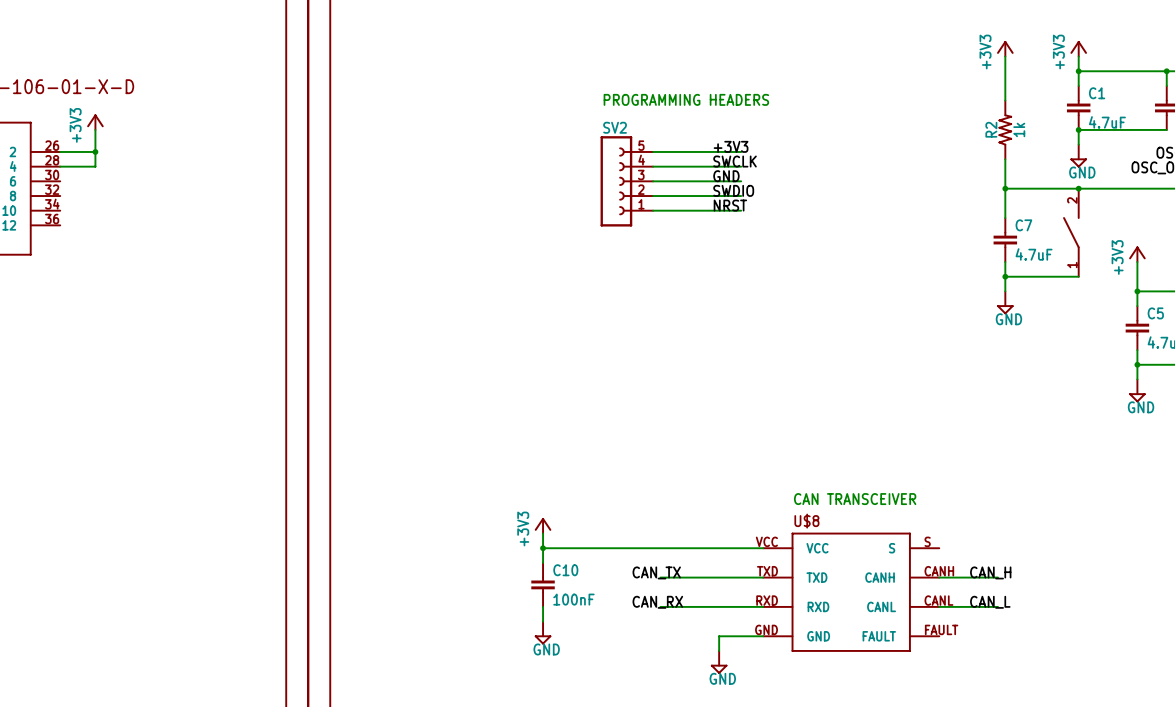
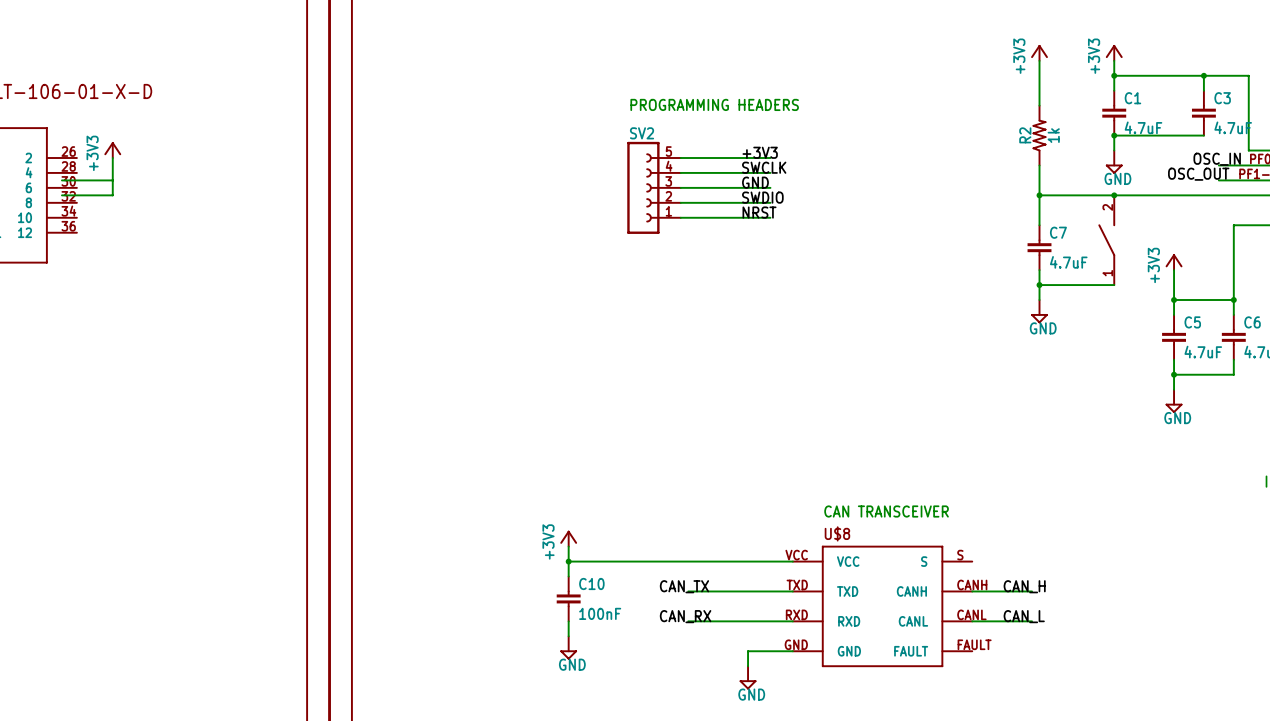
power symbol position: +3V3 (95, 122) -> +3V3 (112, 150)
wire: (95, 129) (95, 151) (60, 151) -> none
junction: (95, 151) -> none
wire: (60, 166) (95, 166) -> (61, 195) (112, 195) (112, 172)
wire: none -> (61, 180) (112, 180)

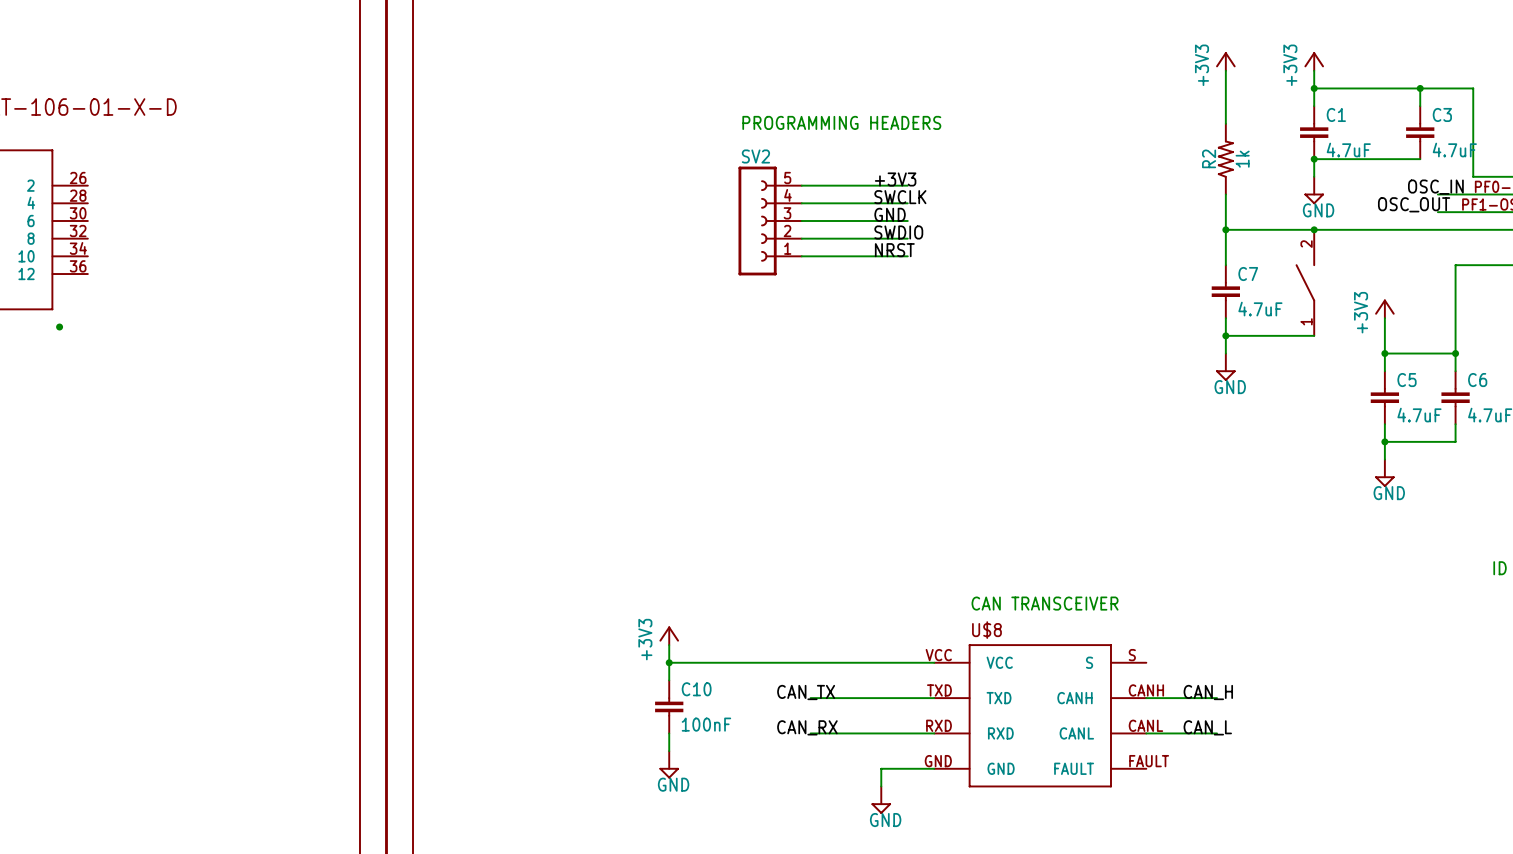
power symbol: +3V3 (112, 150) -> none
wire: (112, 158) (112, 195) (61, 195) -> none
wire: (61, 180) (112, 180) -> none
junction: none -> (59, 327)

